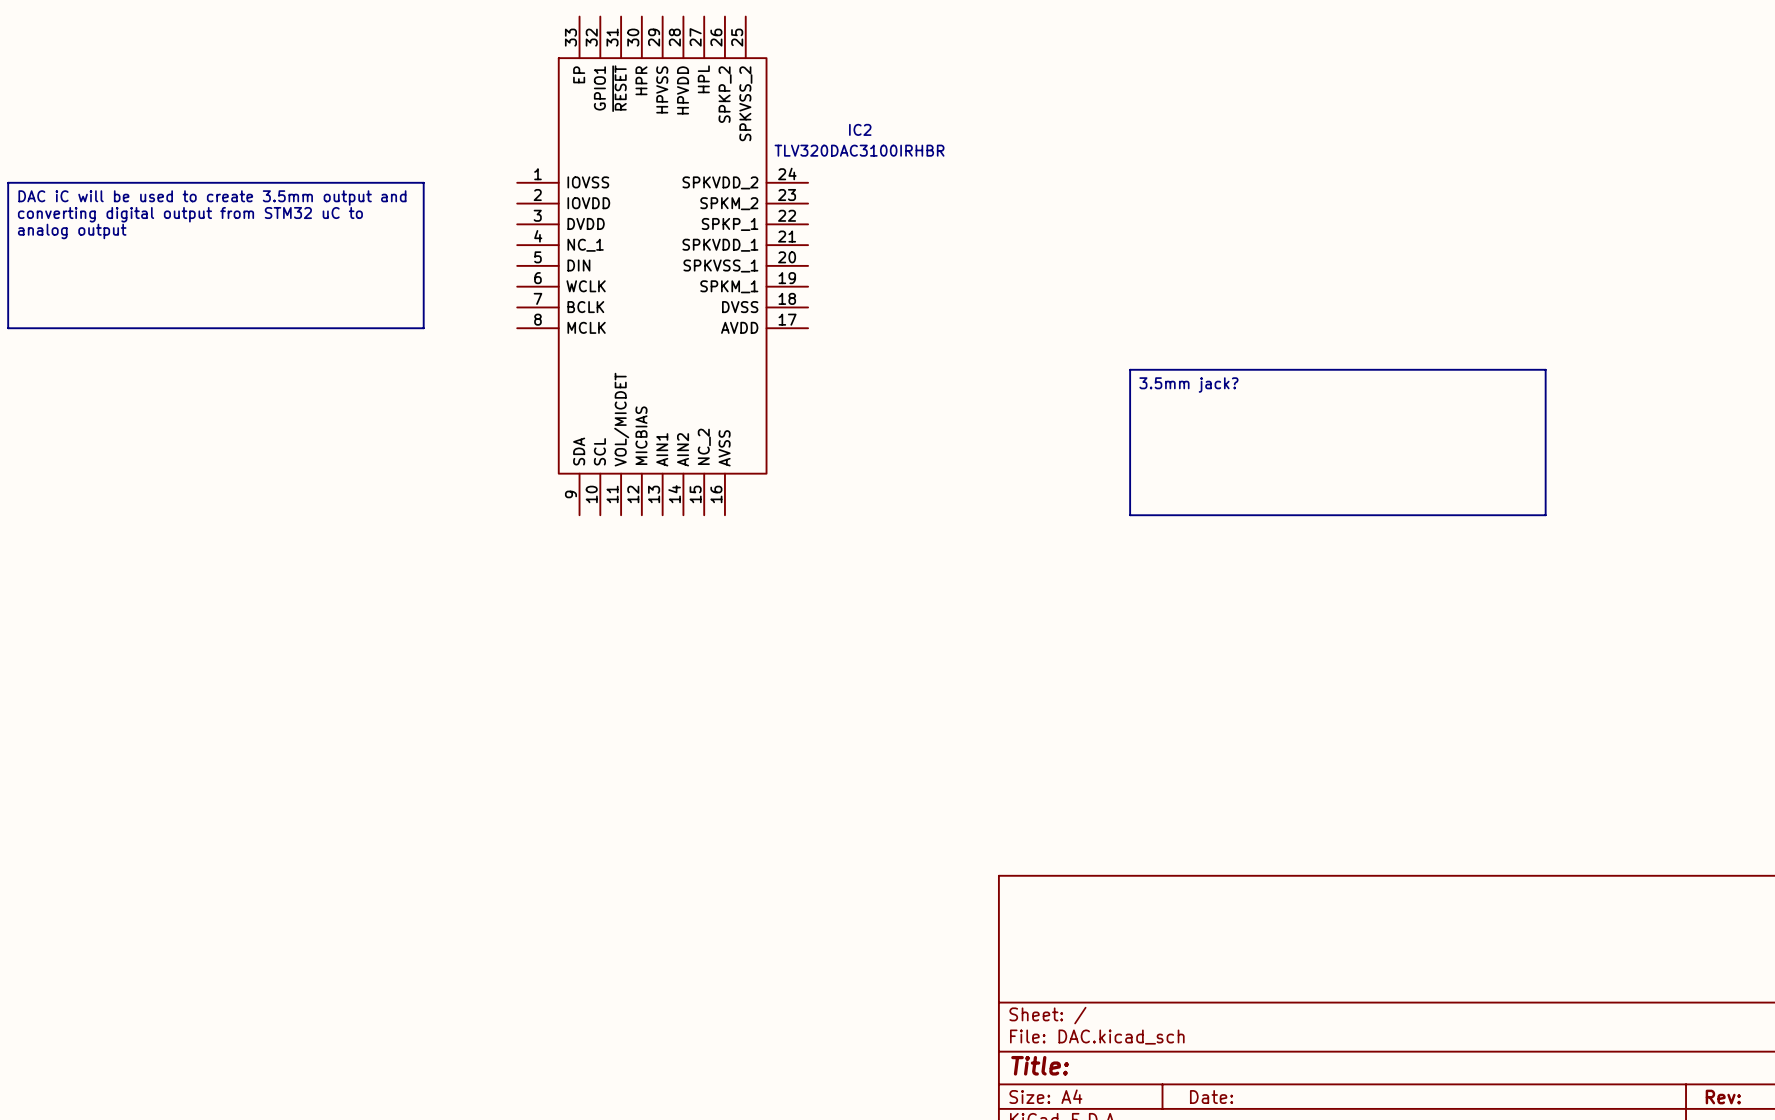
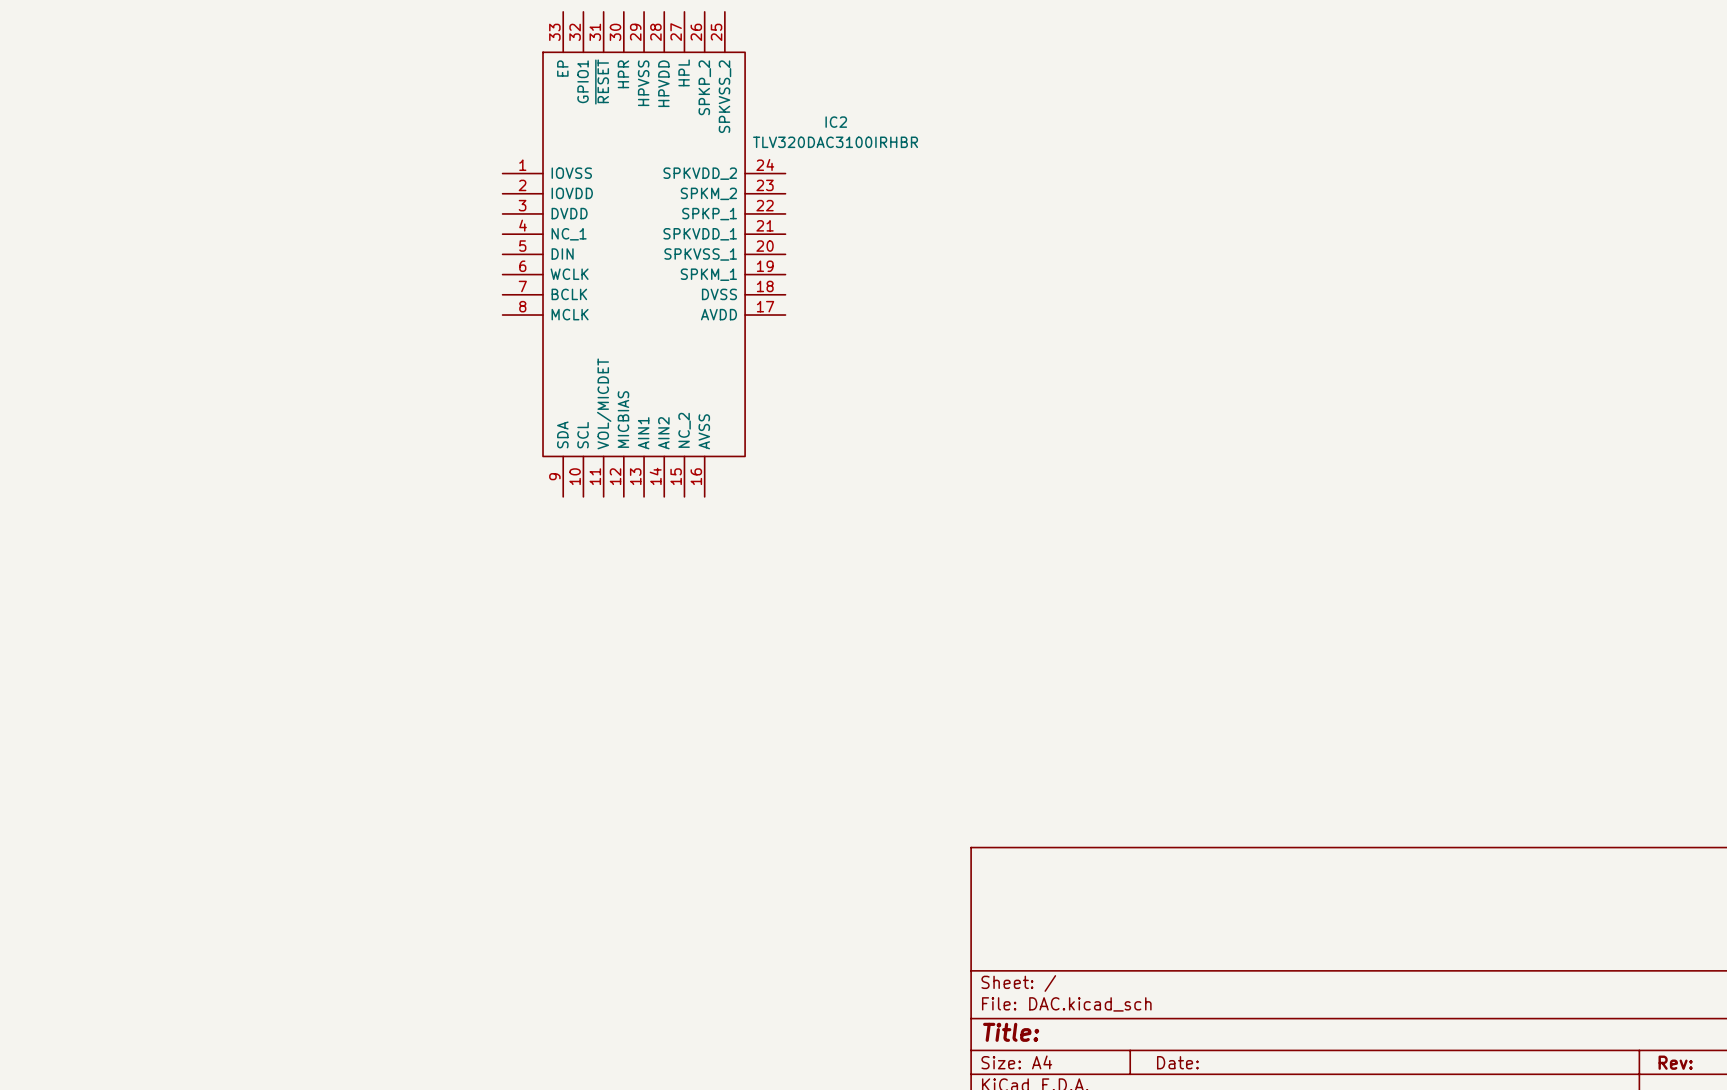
line: (8, 182) (423, 182) (423, 328) (8, 328) (8, 182) -> none
text: DAC iC will be used to create 3.5mm output and (212, 198) -> none
text: converting digital output from STM32 uC to (190, 214) -> none
text: analog output (72, 231) -> none
line: (1130, 369) (1545, 369) (1545, 515) (1130, 515) (1130, 369) -> none
text: 3.5mm jack? (1188, 385) -> none

